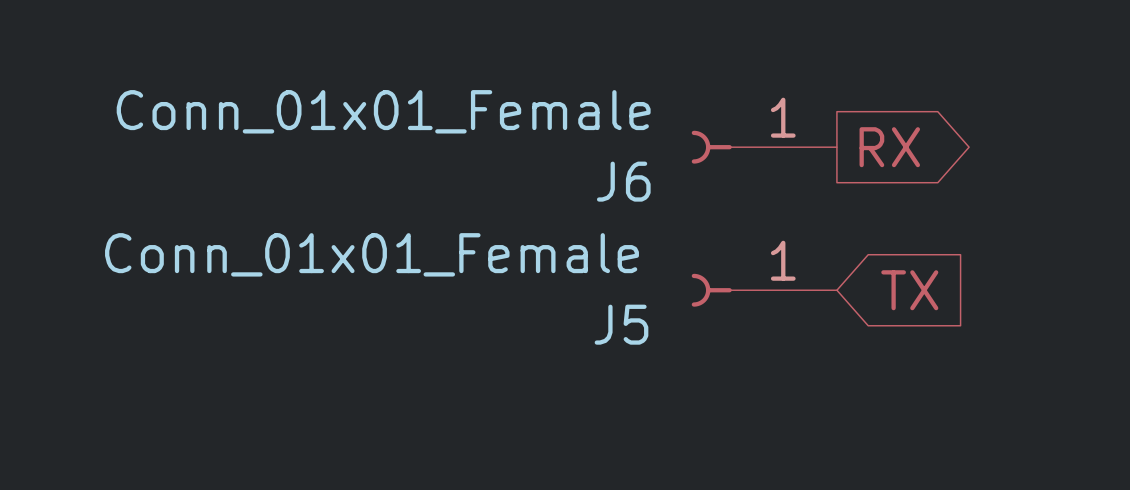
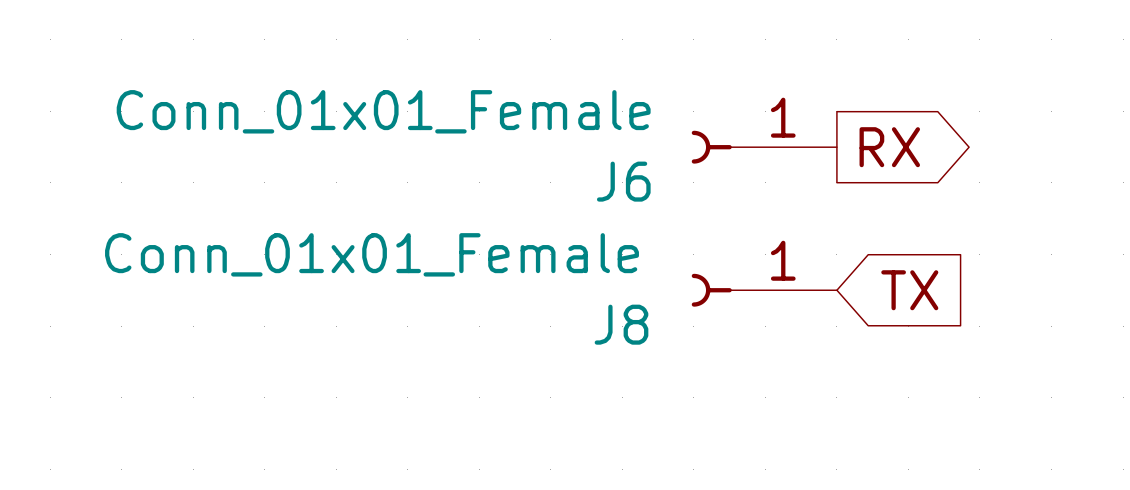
J5 name: J5 (621, 324) -> J8 (621, 324)

